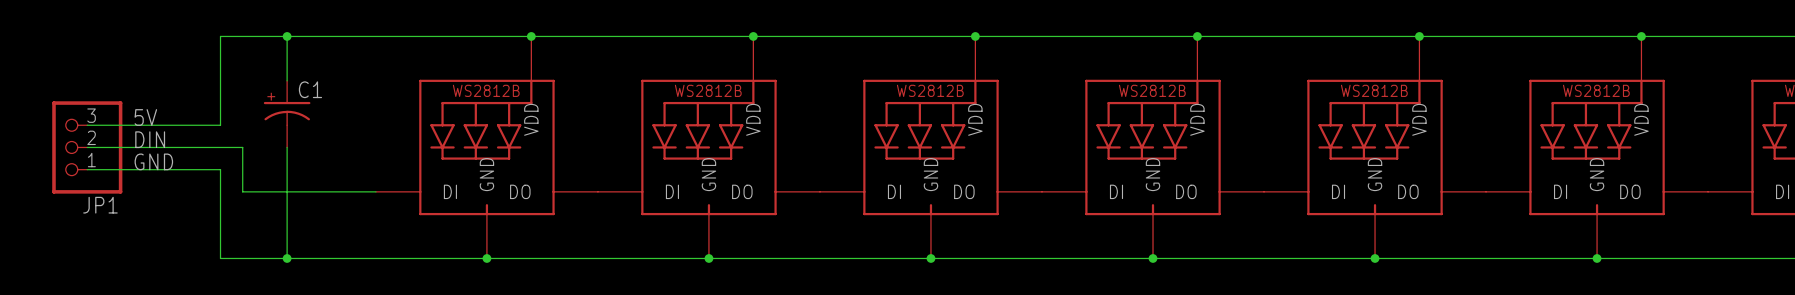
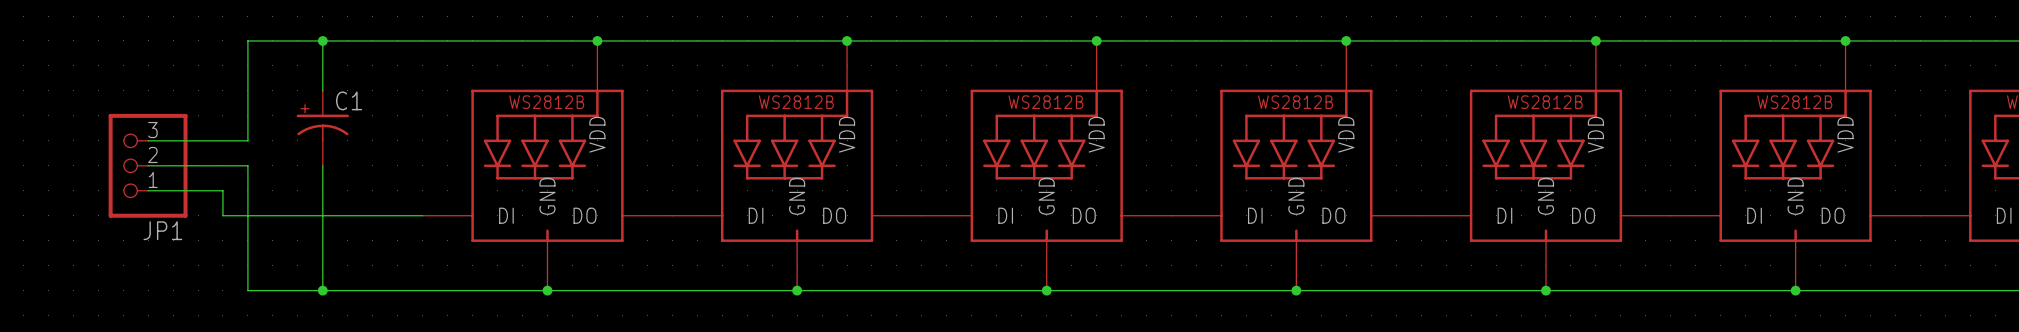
label: 5V (145, 117) -> none
wire: (87, 125) (131, 125) -> none
label: DIN (150, 139) -> none
wire: (87, 147) (131, 147) -> none
JP1 position: (87, 147) -> (148, 165)
wire: (220, 147) (242, 147) (242, 191) -> (247, 165) (247, 190)
label: GND (153, 161) -> none
wire: (87, 169) (131, 169) -> none
wire: (198, 169) (220, 169) -> (222, 190) (222, 215) (272, 215)

